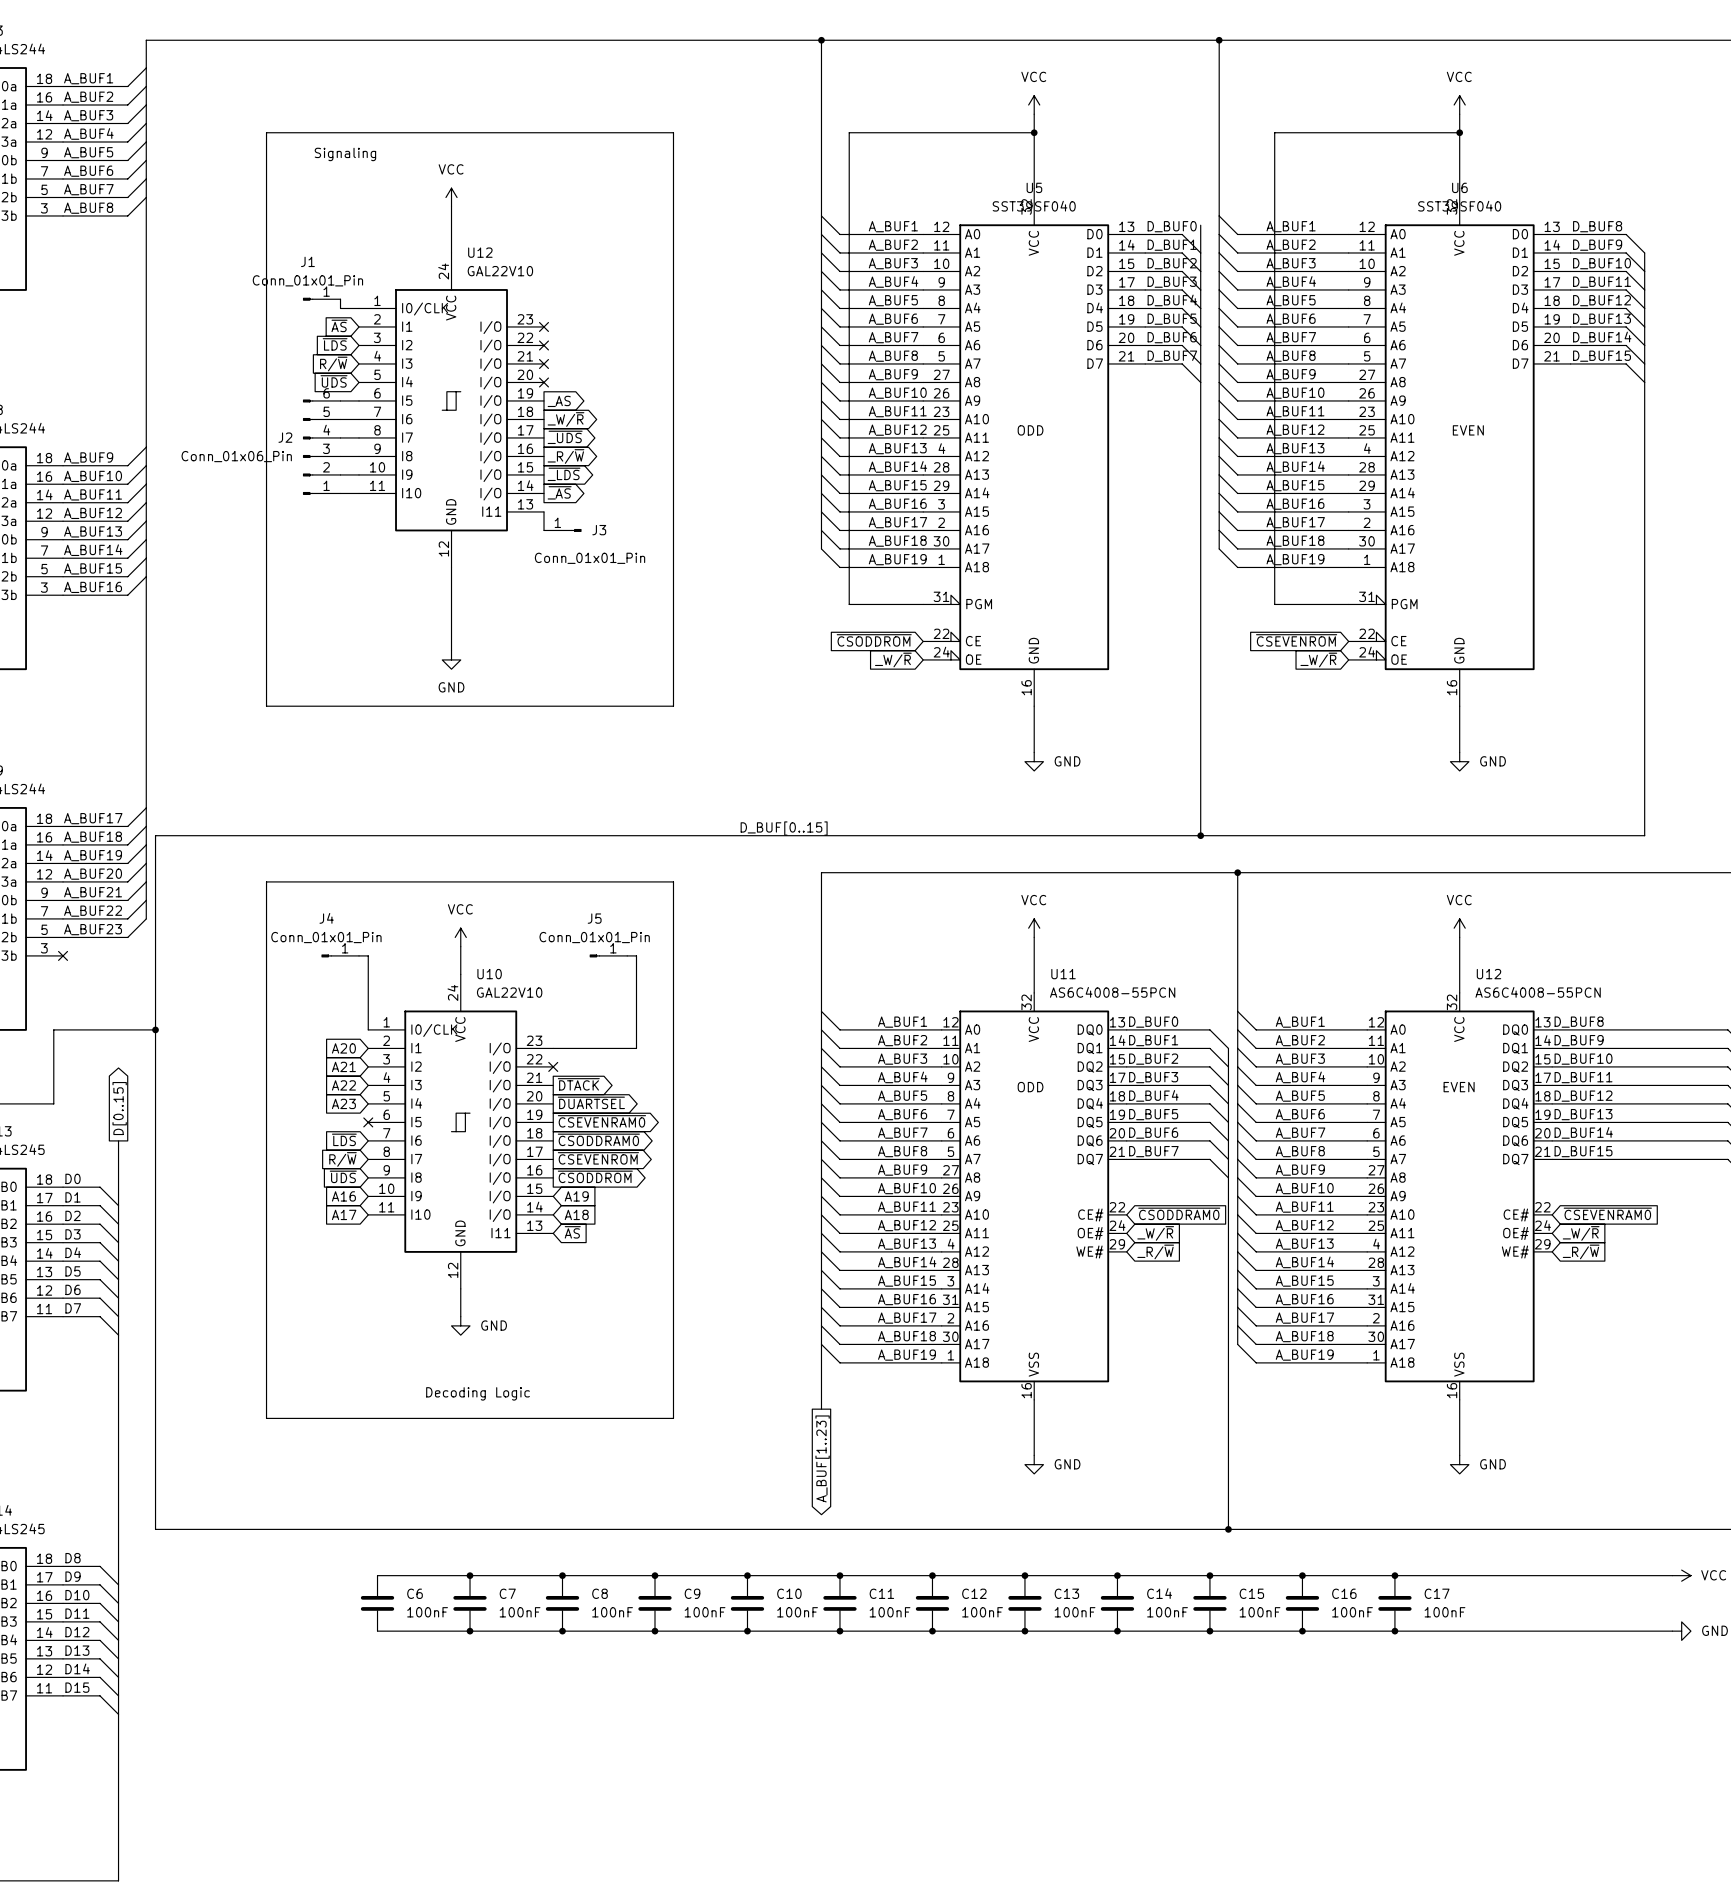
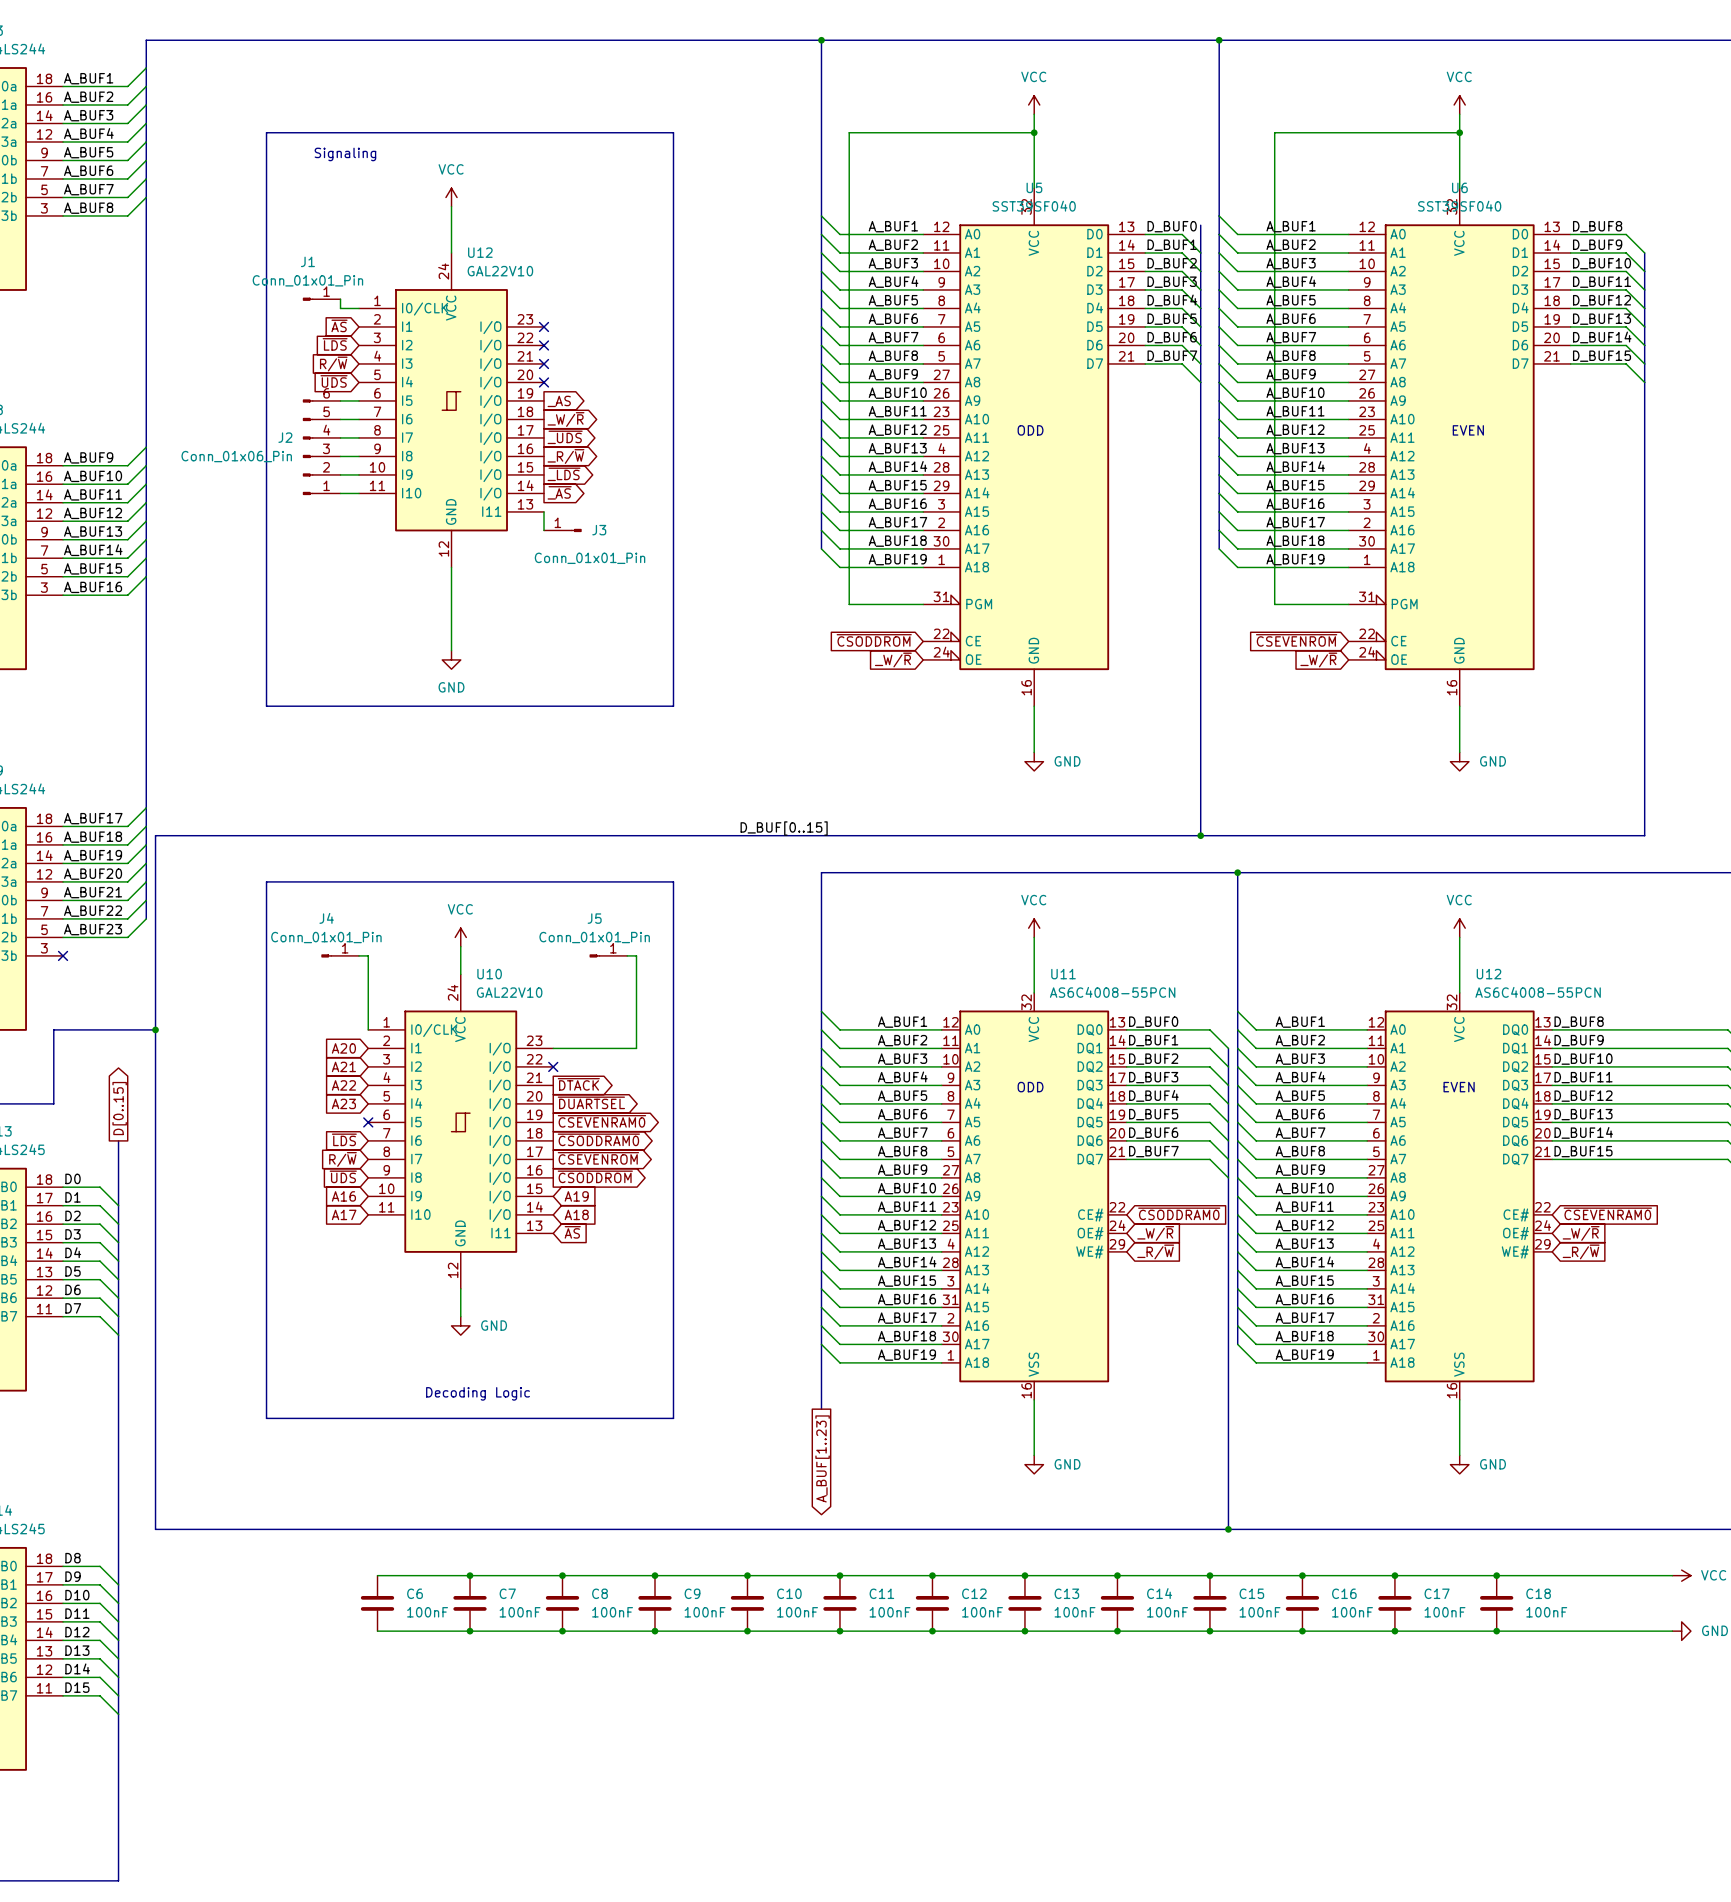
junction: none -> (1496, 1575)
C18: none -> 100nF (1496, 1603)
junction: none -> (1496, 1631)

